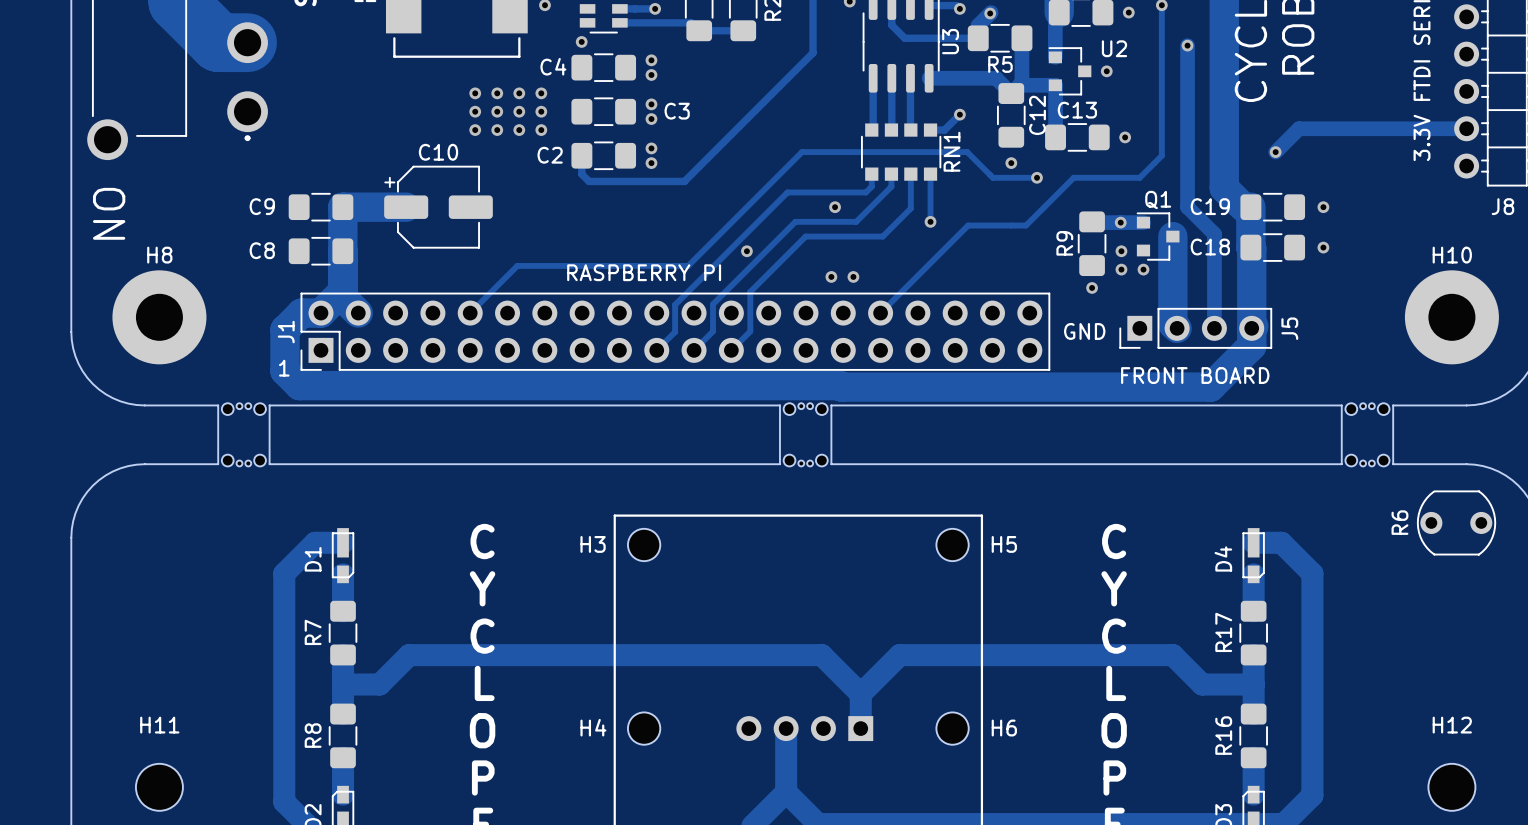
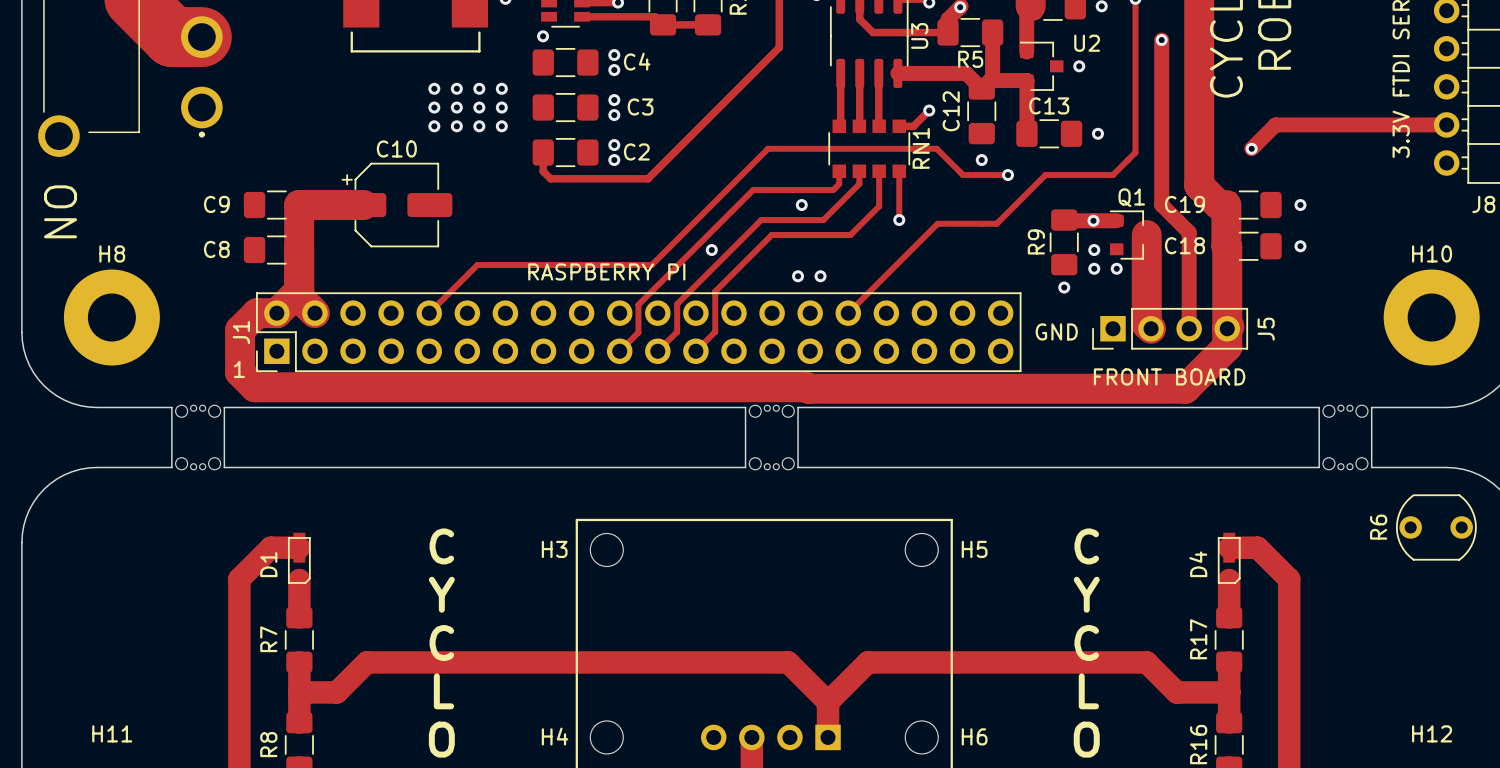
C4 name position: C4 (553, 66) -> C4 (637, 61)
C12 name position: C12 (1037, 115) -> C12 (951, 111)
C2 name position: C2 (550, 155) -> C2 (636, 151)

